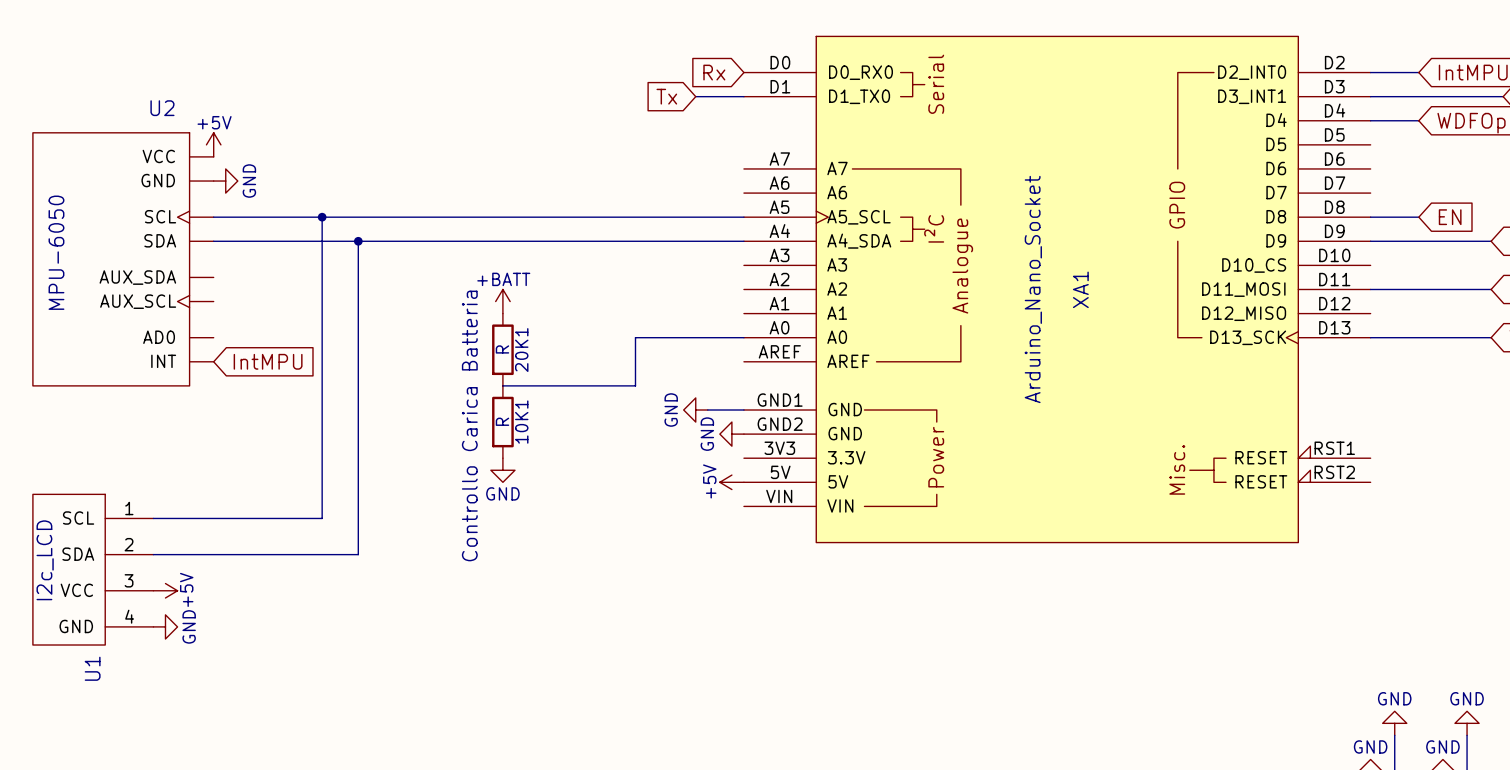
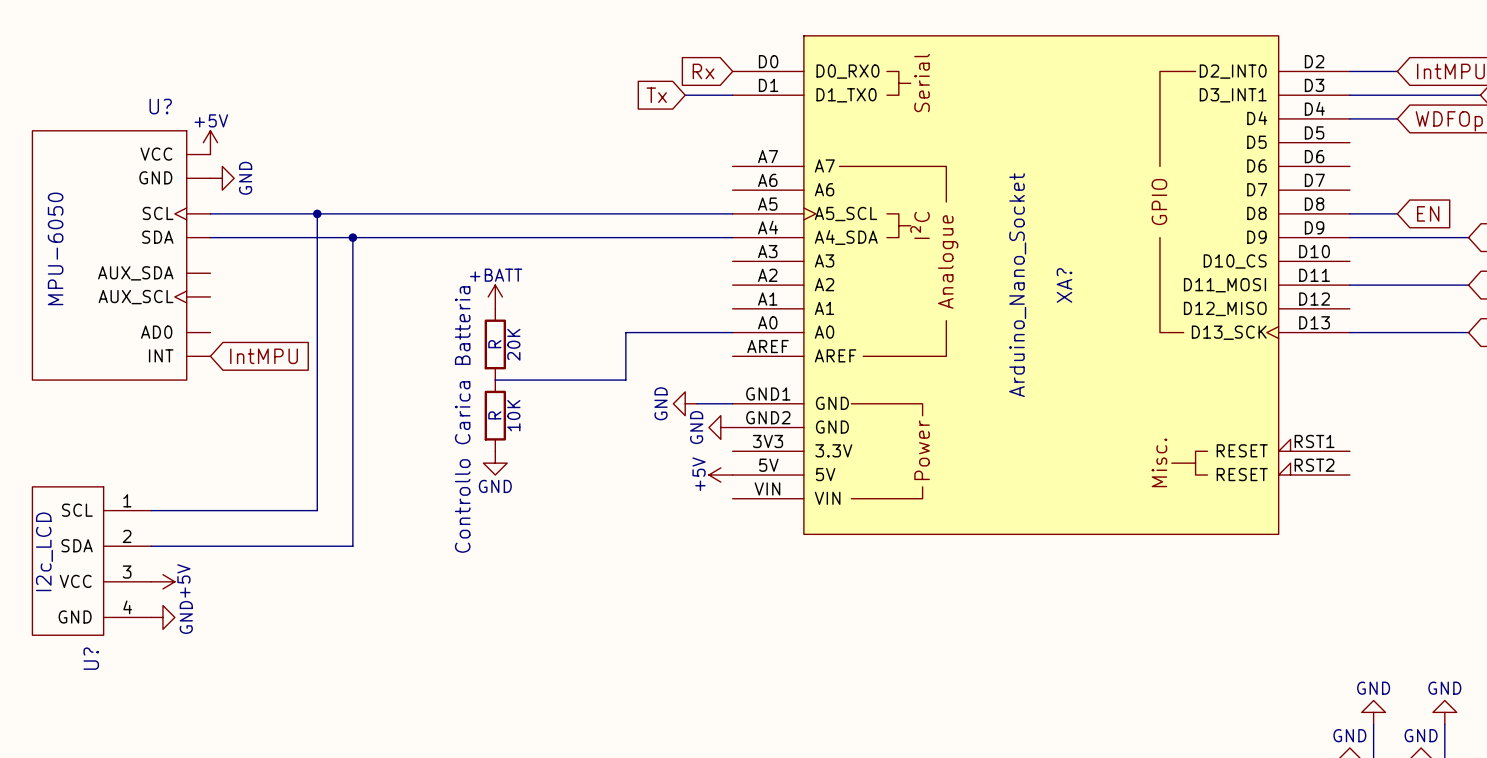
U2 name: U2 (162, 108) -> U? (160, 106)
XA1 name: XA1 (1080, 289) -> XA? (1064, 285)
20K1 name: 20K1 (521, 350) -> 20K (513, 344)
10K1 name: 10K1 (521, 422) -> 10K (513, 415)
U1 name: U1 (92, 668) -> U? (91, 658)

